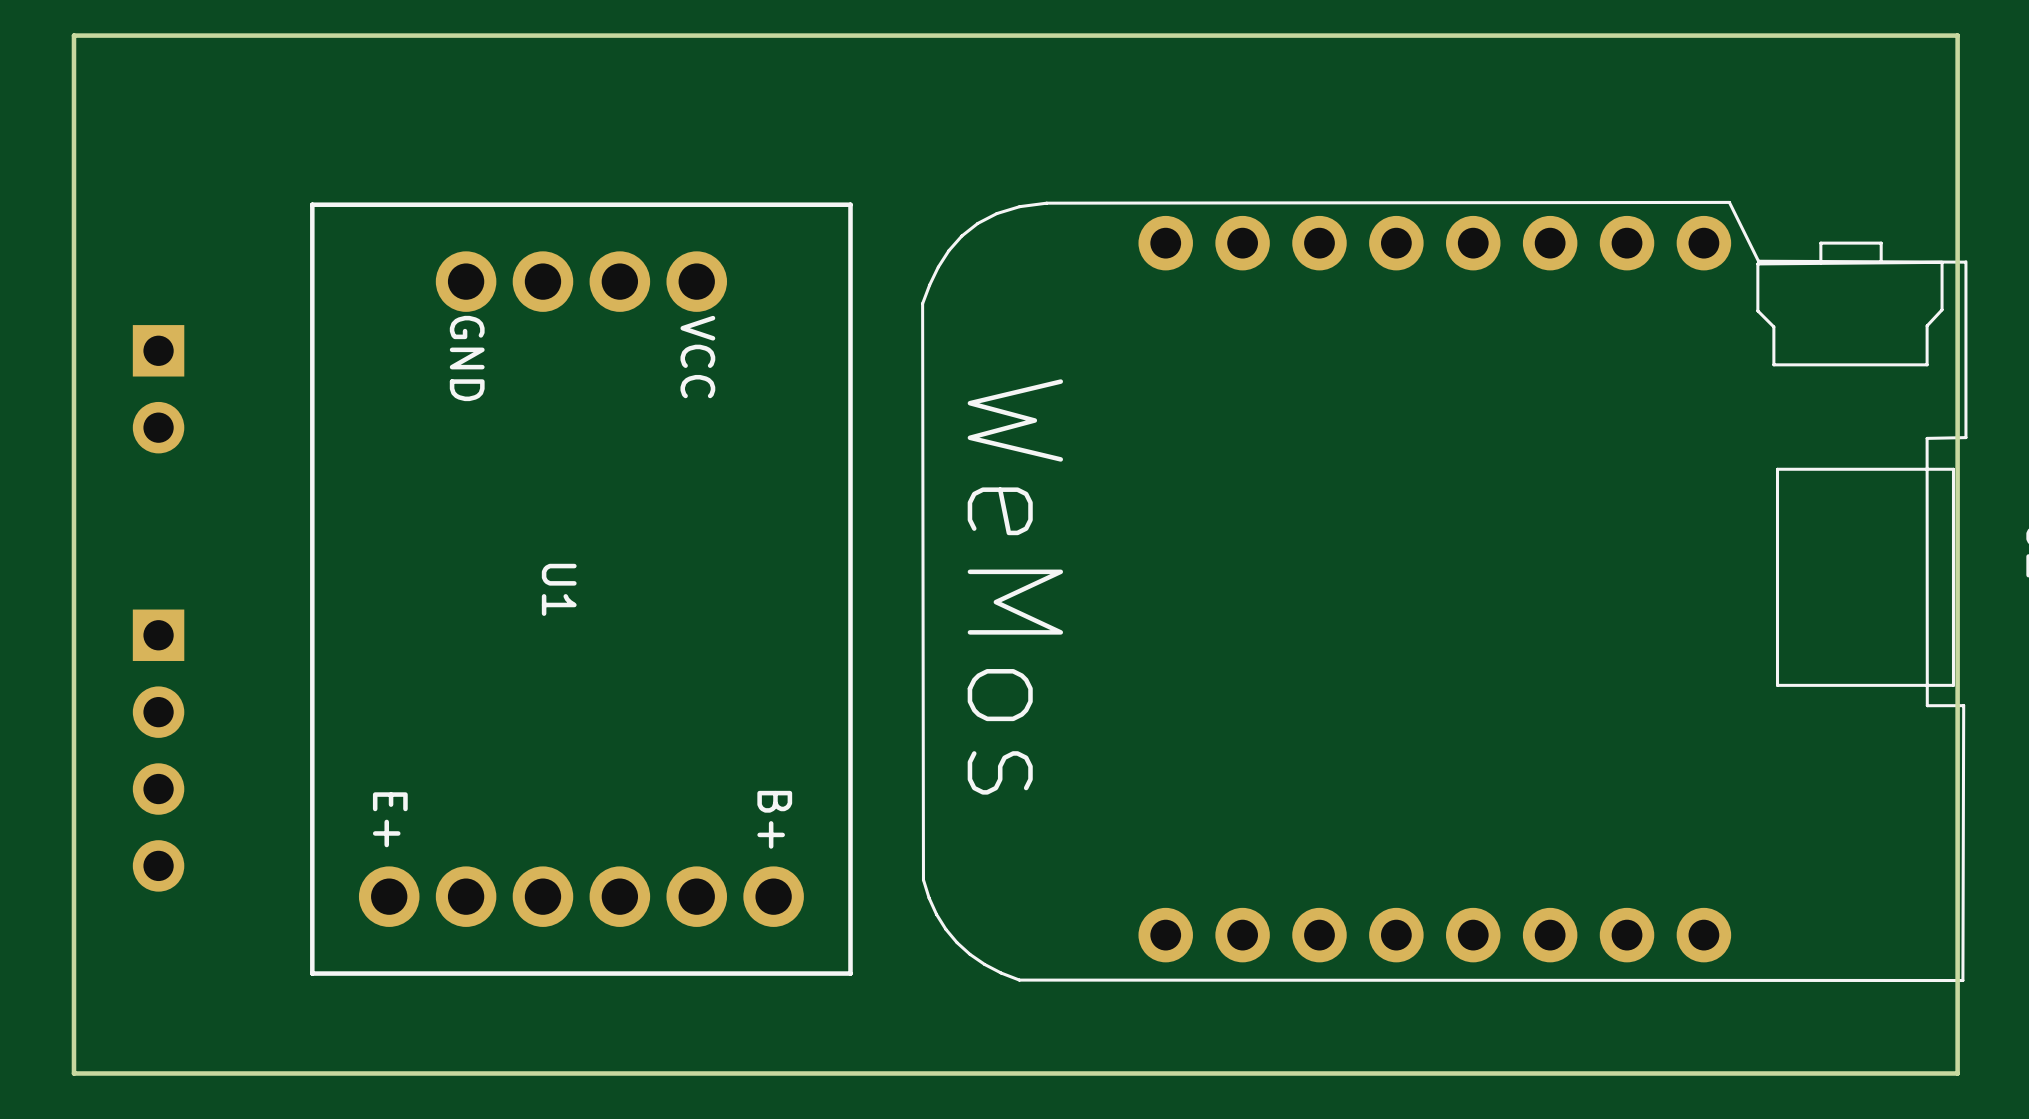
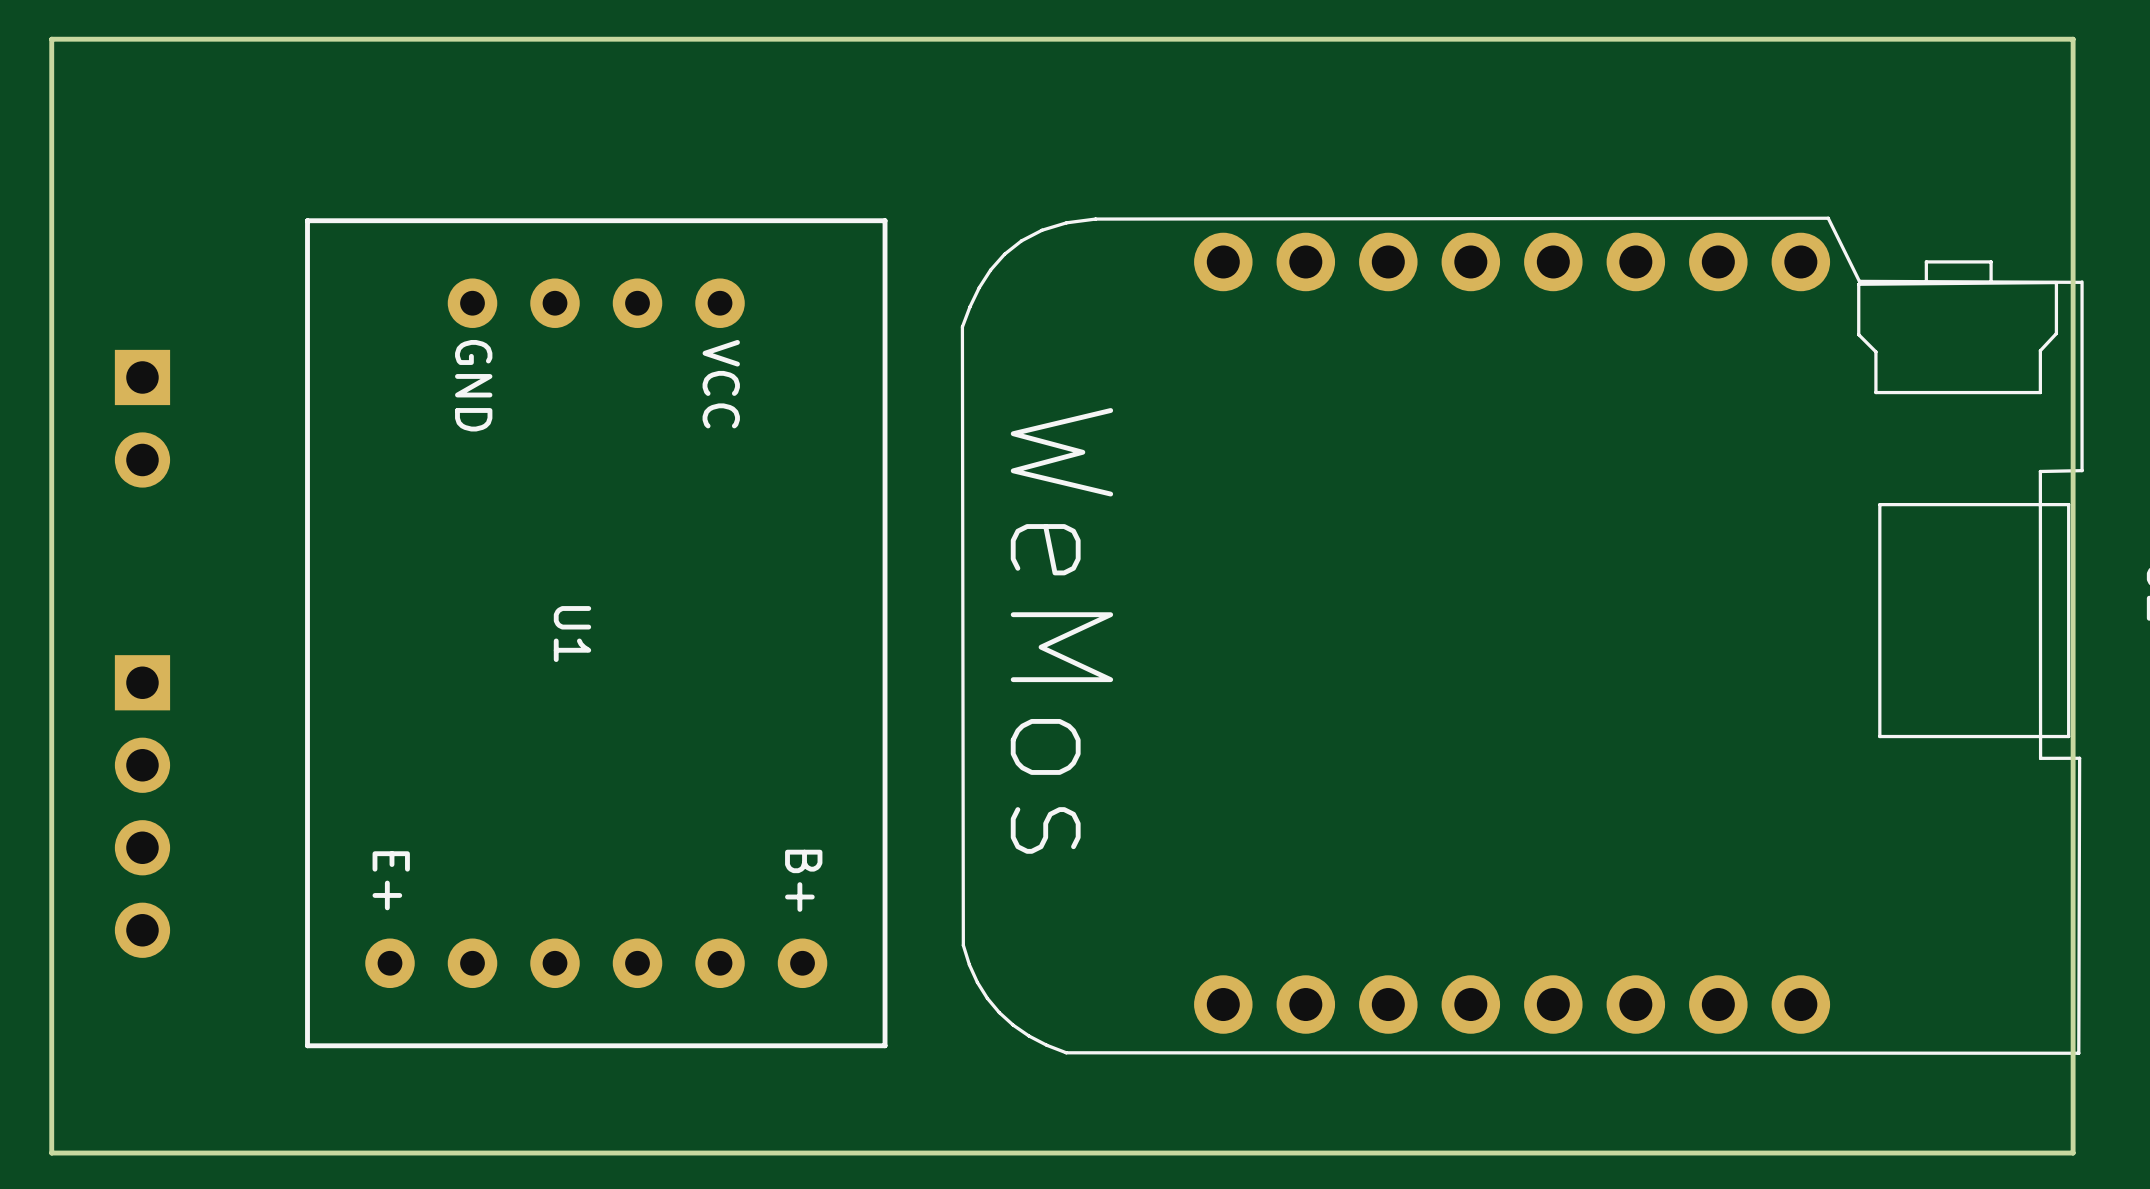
U1 footprint: [310, 202, 853, 976] -> [305, 218, 888, 1049]

